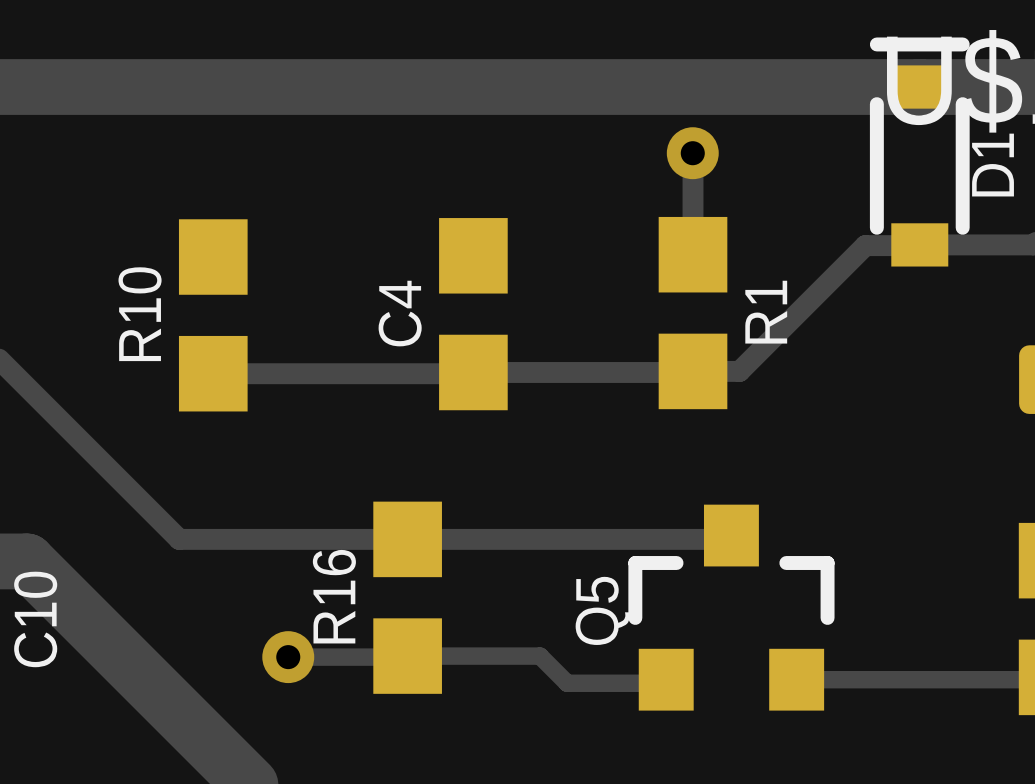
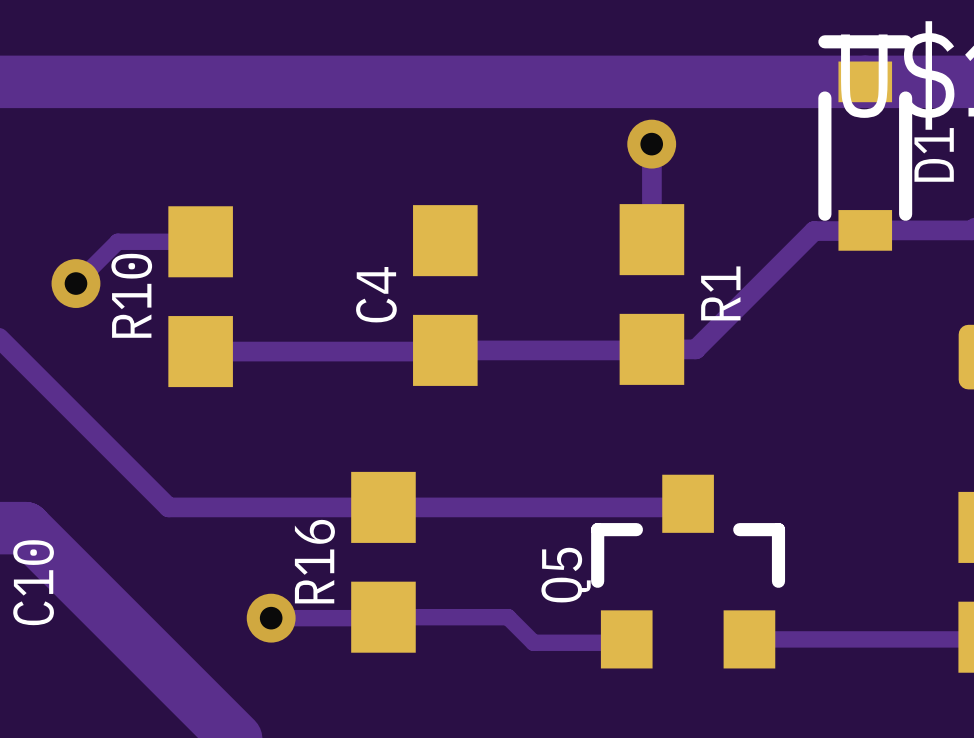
track: none -> (200, 241) (117, 241) (75, 283)
via: none -> (75, 283)

